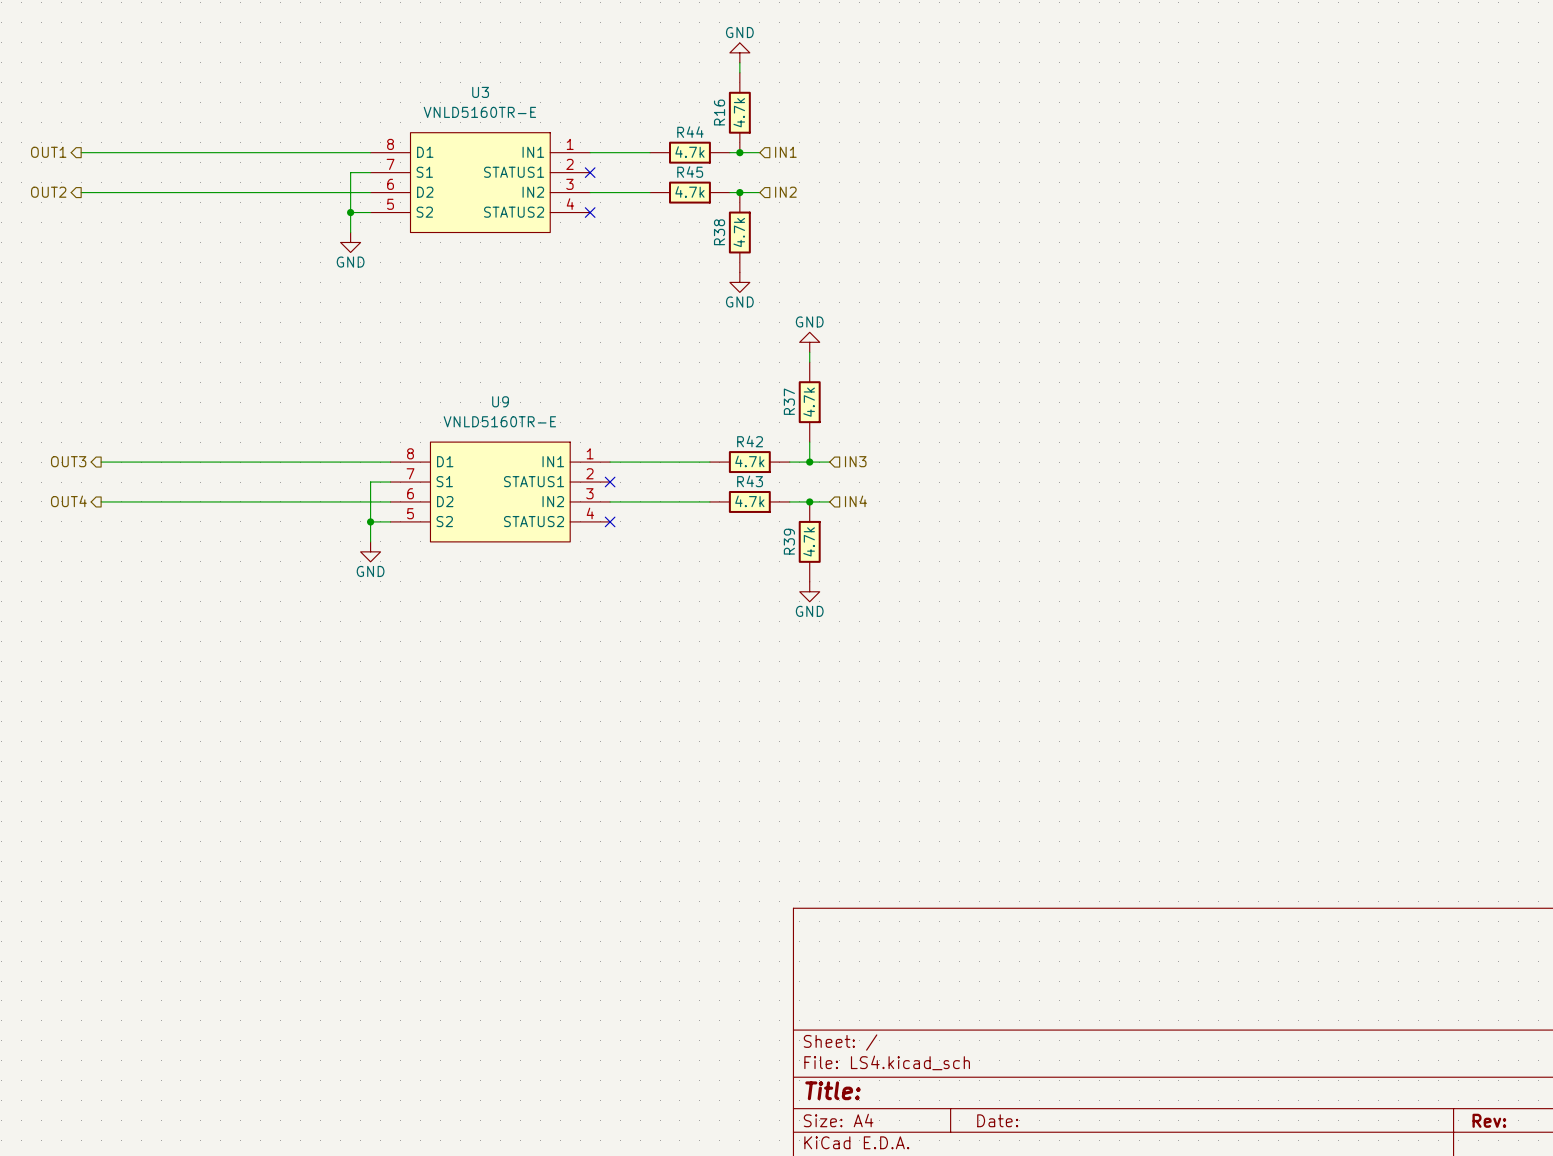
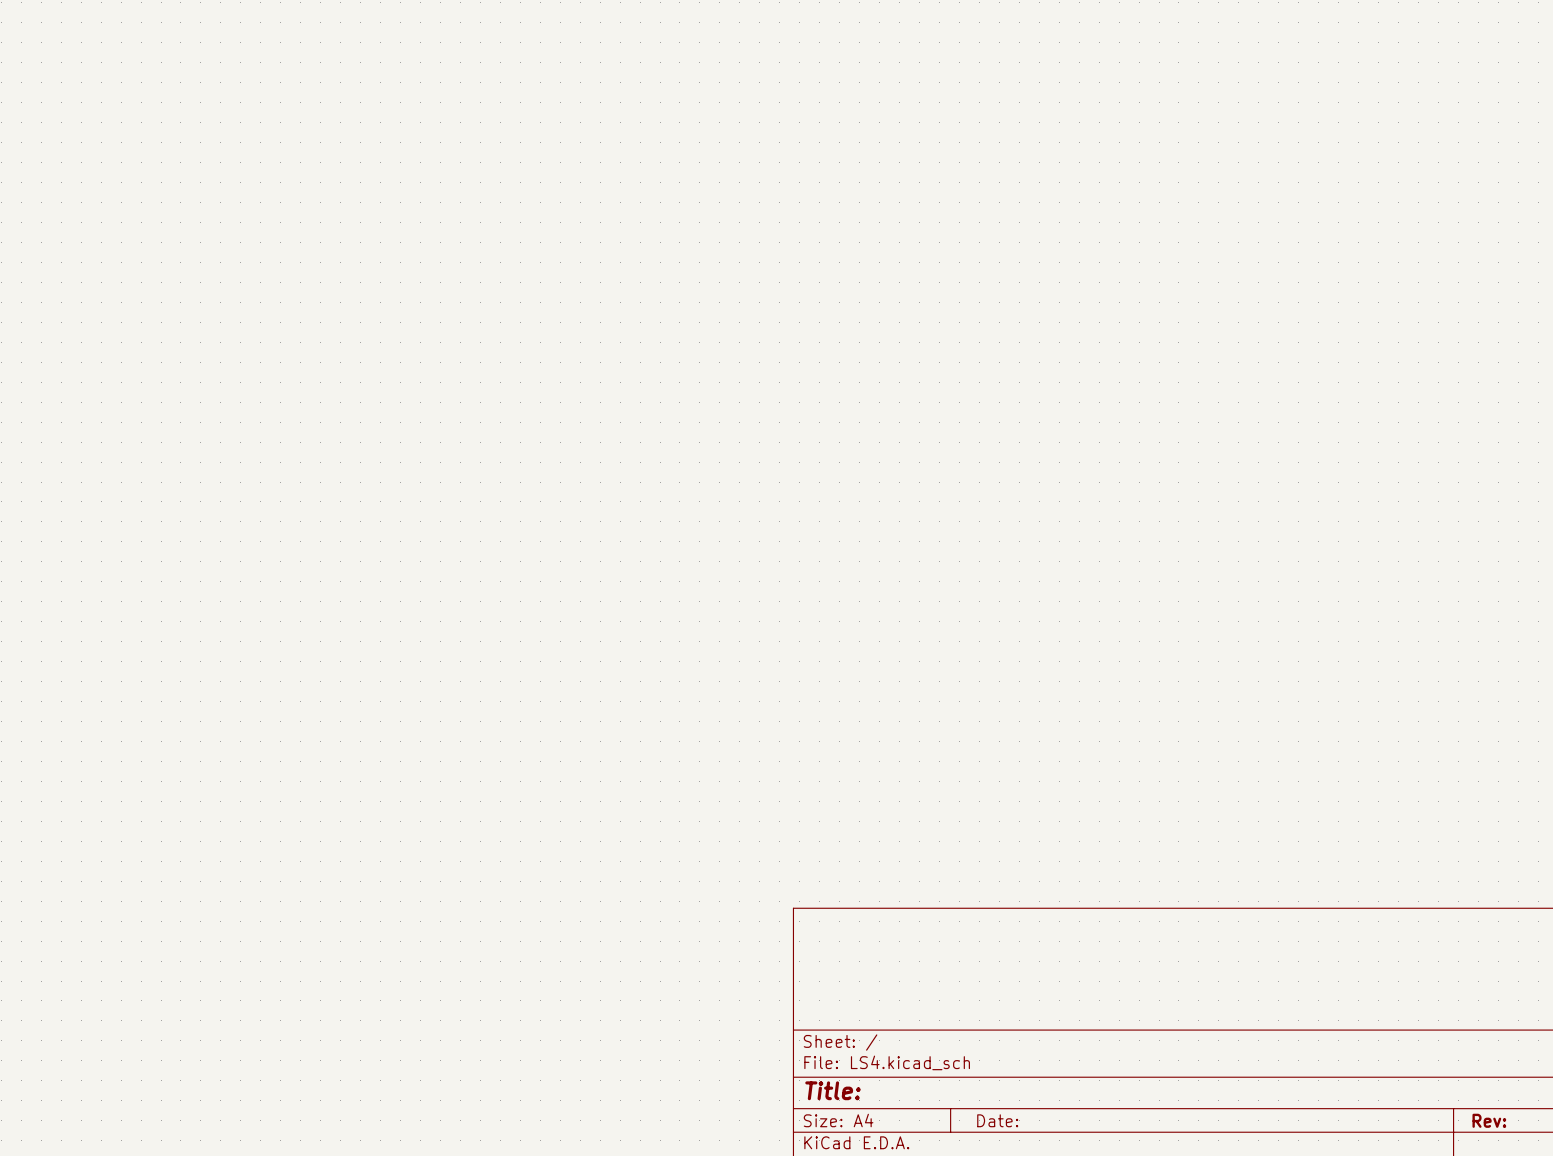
power symbol: GND (739, 52) -> none
wire: (739, 62) (739, 72) -> none
R16: 4.7k (739, 112) -> none
hierarchical label: OUT1 (48, 152) -> none
wire: (81, 152) (370, 152) -> none
wire: (590, 152) (650, 152) -> none
R44: 4.7k (689, 152) -> none
wire: (729, 152) (759, 152) -> none
junction: (739, 152) -> none
hierarchical label: IN1 (785, 152) -> none
wire: (370, 172) (350, 172) (350, 232) -> none
no-connect mark: (590, 172) -> none
U3: VNLD5160TR-E (480, 182) -> none
hierarchical label: OUT2 (48, 192) -> none
wire: (81, 192) (370, 192) -> none
wire: (590, 192) (650, 192) -> none
R45: 4.7k (689, 192) -> none
wire: (729, 192) (759, 192) -> none
junction: (739, 192) -> none
hierarchical label: IN2 (785, 192) -> none
wire: (350, 212) (370, 212) -> none
junction: (350, 212) -> none
no-connect mark: (590, 212) -> none
R38: 4.7k (739, 232) -> none
power symbol: GND (350, 242) -> none
power symbol: GND (739, 282) -> none
power symbol: GND (809, 342) -> none
wire: (809, 352) (809, 362) -> none
R37: 4.7k (809, 402) -> none
wire: (809, 442) (809, 462) -> none
hierarchical label: OUT3 (68, 461) -> none
hierarchical label: IN3 (855, 461) -> none
wire: (101, 462) (390, 462) -> none
wire: (610, 462) (709, 462) -> none
R42: 4.7k (749, 462) -> none
wire: (789, 462) (829, 462) -> none
junction: (809, 462) -> none
wire: (390, 482) (370, 482) (370, 541) -> none
no-connect mark: (610, 482) -> none
U9: VNLD5160TR-E (500, 491) -> none
hierarchical label: OUT4 (68, 501) -> none
wire: (101, 501) (390, 501) -> none
wire: (610, 501) (709, 501) -> none
R43: 4.7k (749, 501) -> none
wire: (789, 501) (829, 501) -> none
junction: (809, 501) -> none
hierarchical label: IN4 (855, 501) -> none
wire: (370, 521) (390, 521) -> none
junction: (370, 521) -> none
no-connect mark: (610, 521) -> none
R39: 4.7k (809, 541) -> none
power symbol: GND (370, 551) -> none
power symbol: GND (809, 591) -> none

